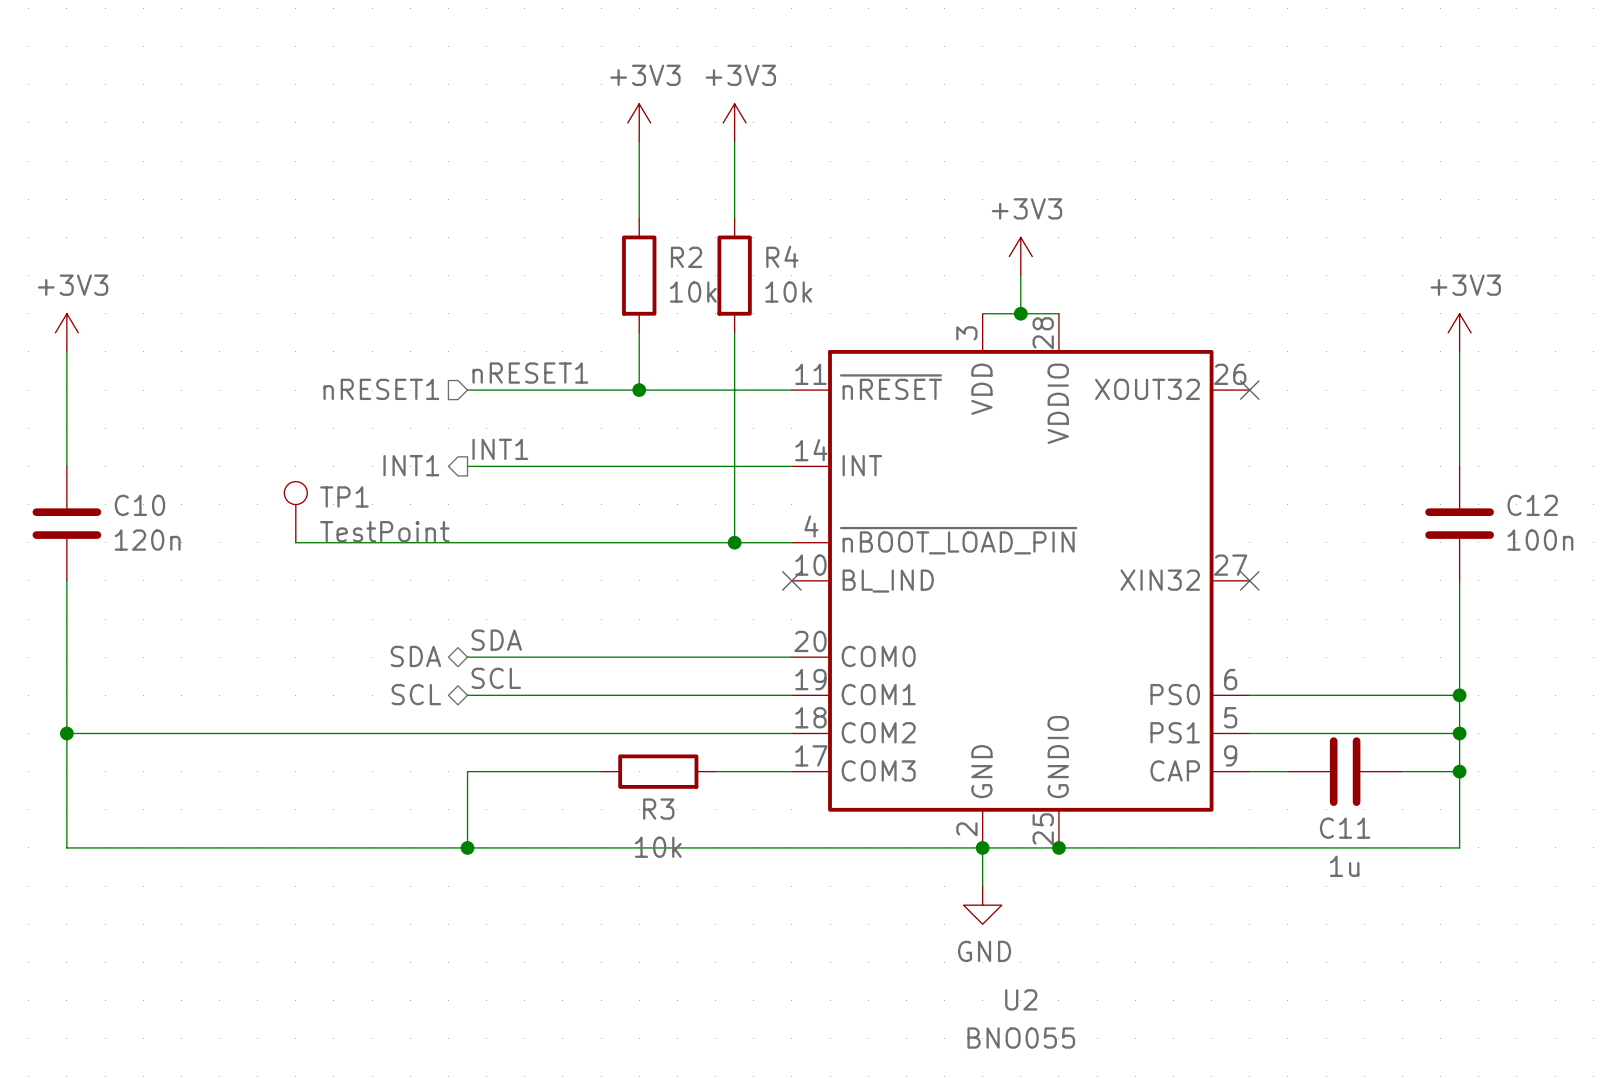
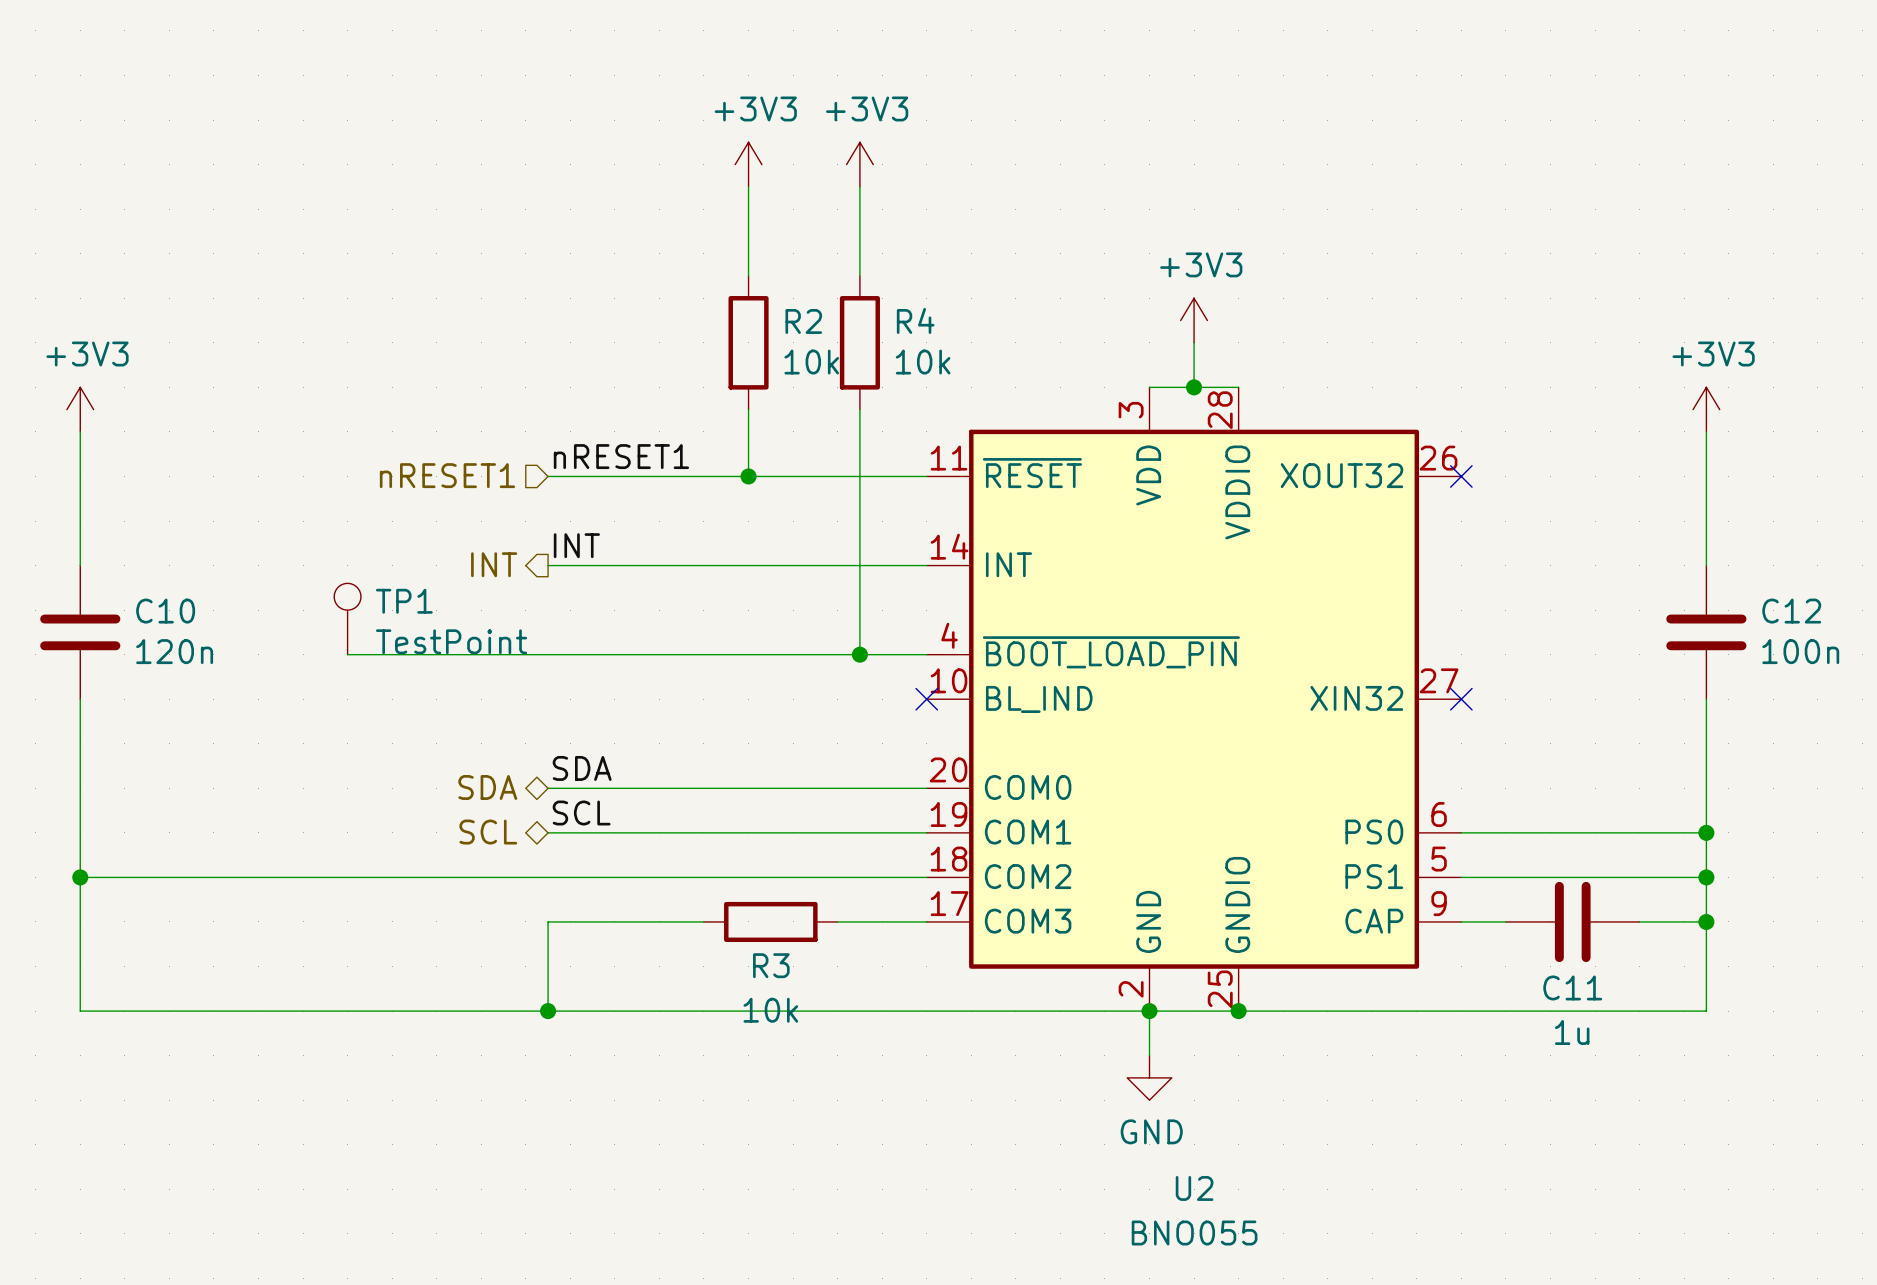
U2 pin name: ~{nRESET} (890, 387) -> ~{RESET} (1032, 473)
label: INT1 (500, 449) -> INT (576, 545)
hierarchical label: INT1 (411, 465) -> INT (494, 564)
U2 pin name: ~{nBOOT_LOAD_PIN} (958, 540) -> ~{BOOT_LOAD_PIN} (1111, 652)

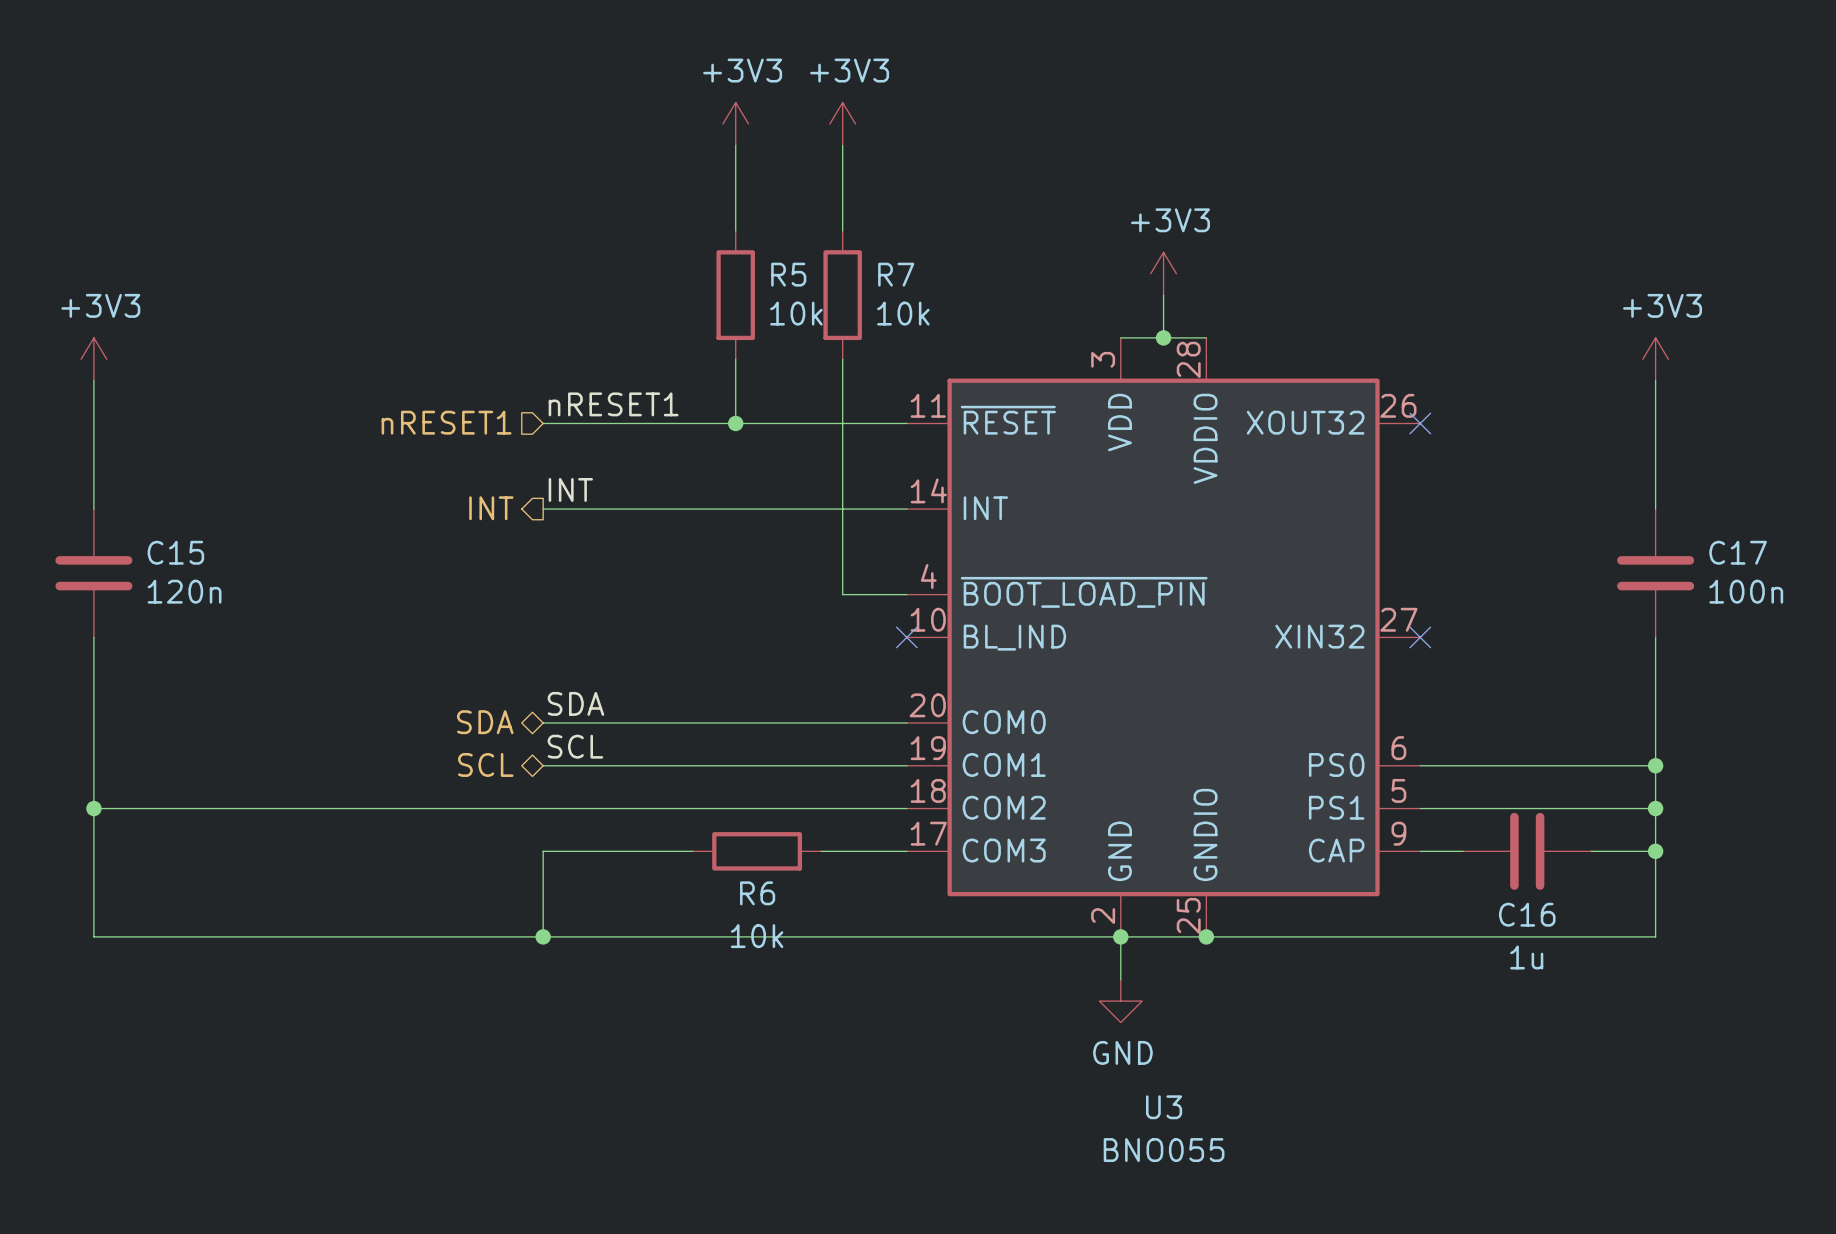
R4 name: R4 (915, 320) -> R7 (896, 274)
R2 name: R2 (803, 321) -> R5 (788, 274)
C10 name: C10 (165, 611) -> C15 (175, 552)
C12 name: C12 (1791, 611) -> C17 (1738, 552)
TP1: TestPoint (347, 619) -> none
wire: (347, 654) (859, 654) -> none
junction: (859, 654) -> none
R3 name: R3 (771, 965) -> R6 (757, 893)
C11 name: C11 (1572, 987) -> C16 (1527, 914)
U2 name: U2 (1194, 1188) -> U3 (1164, 1107)

